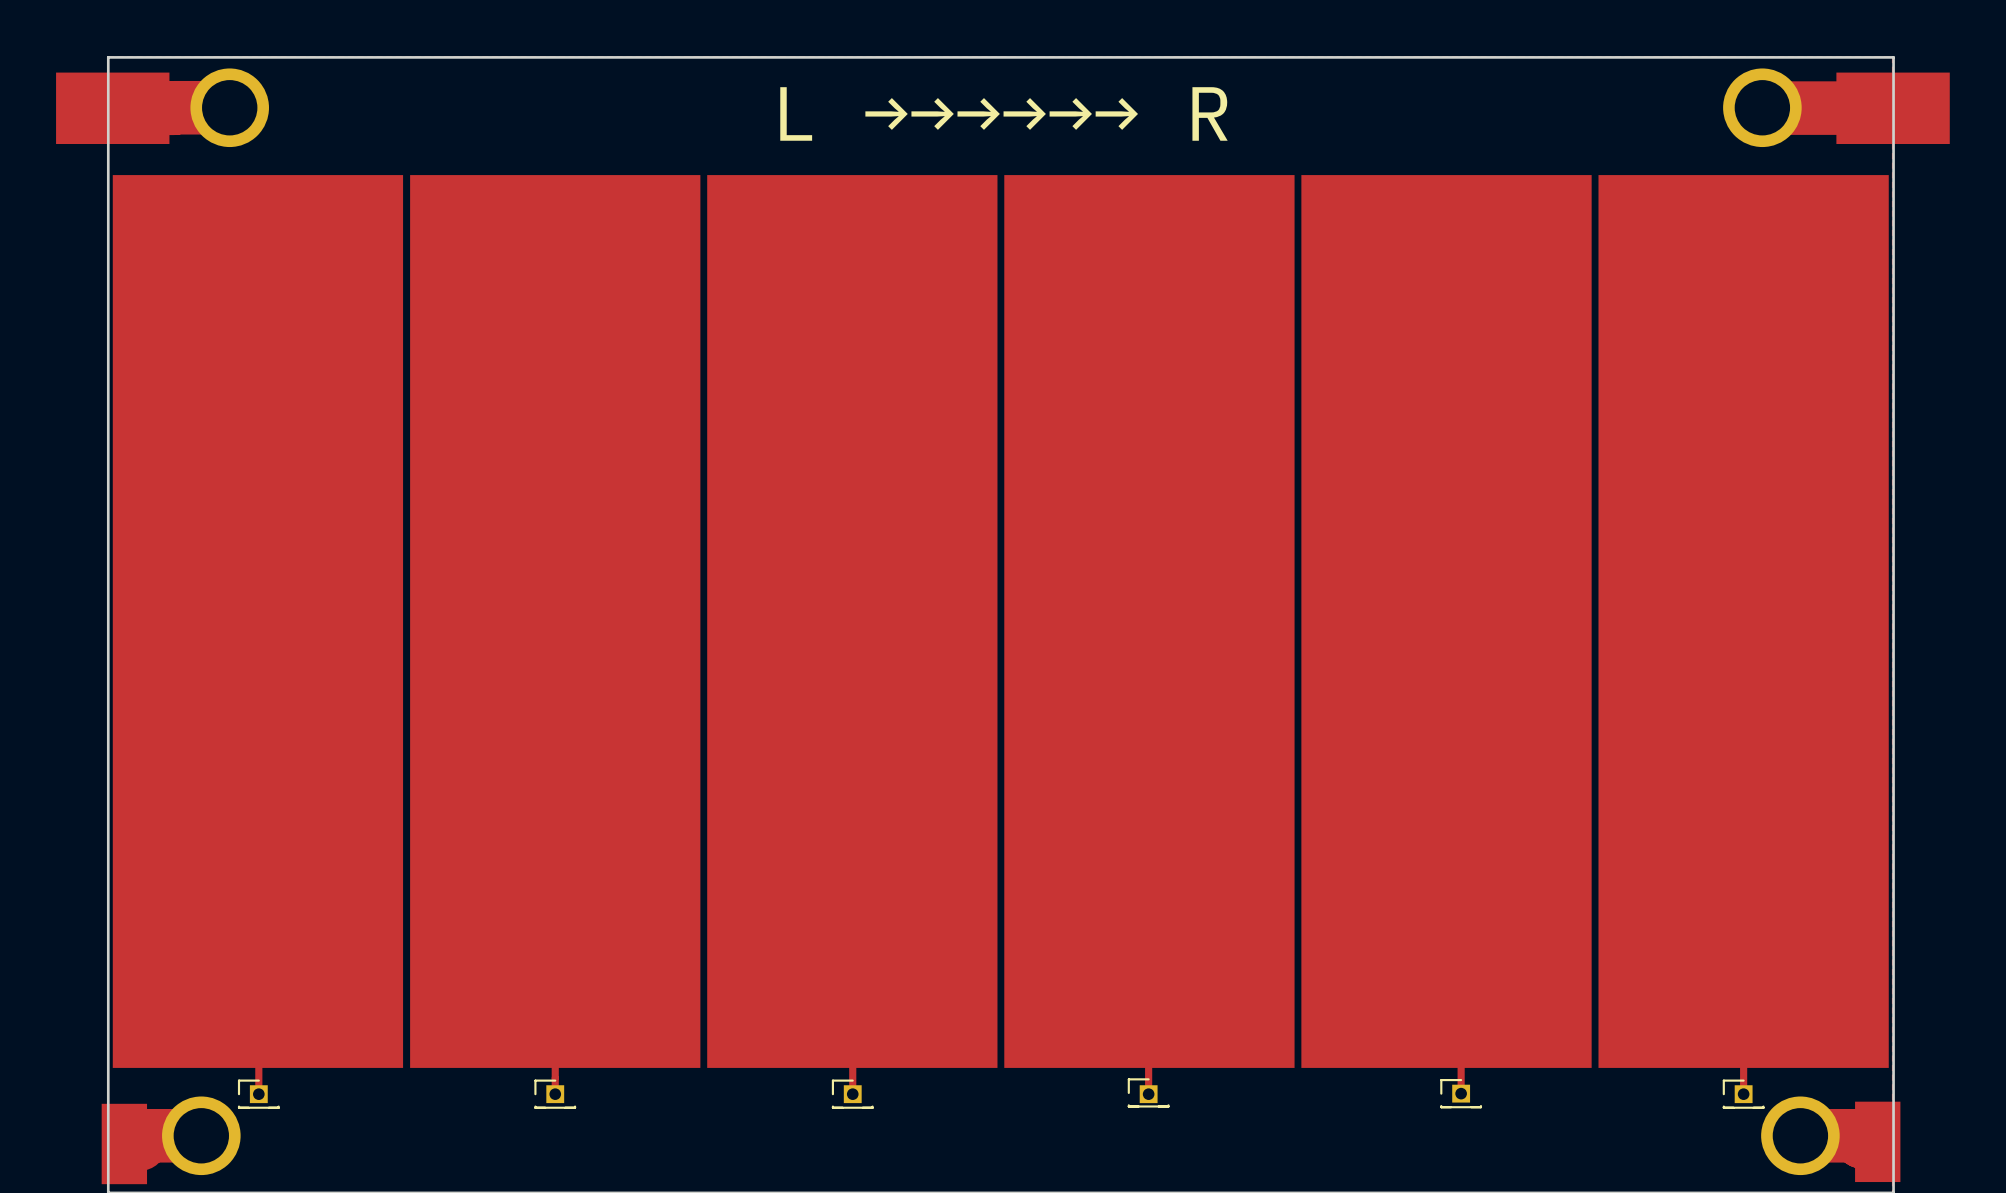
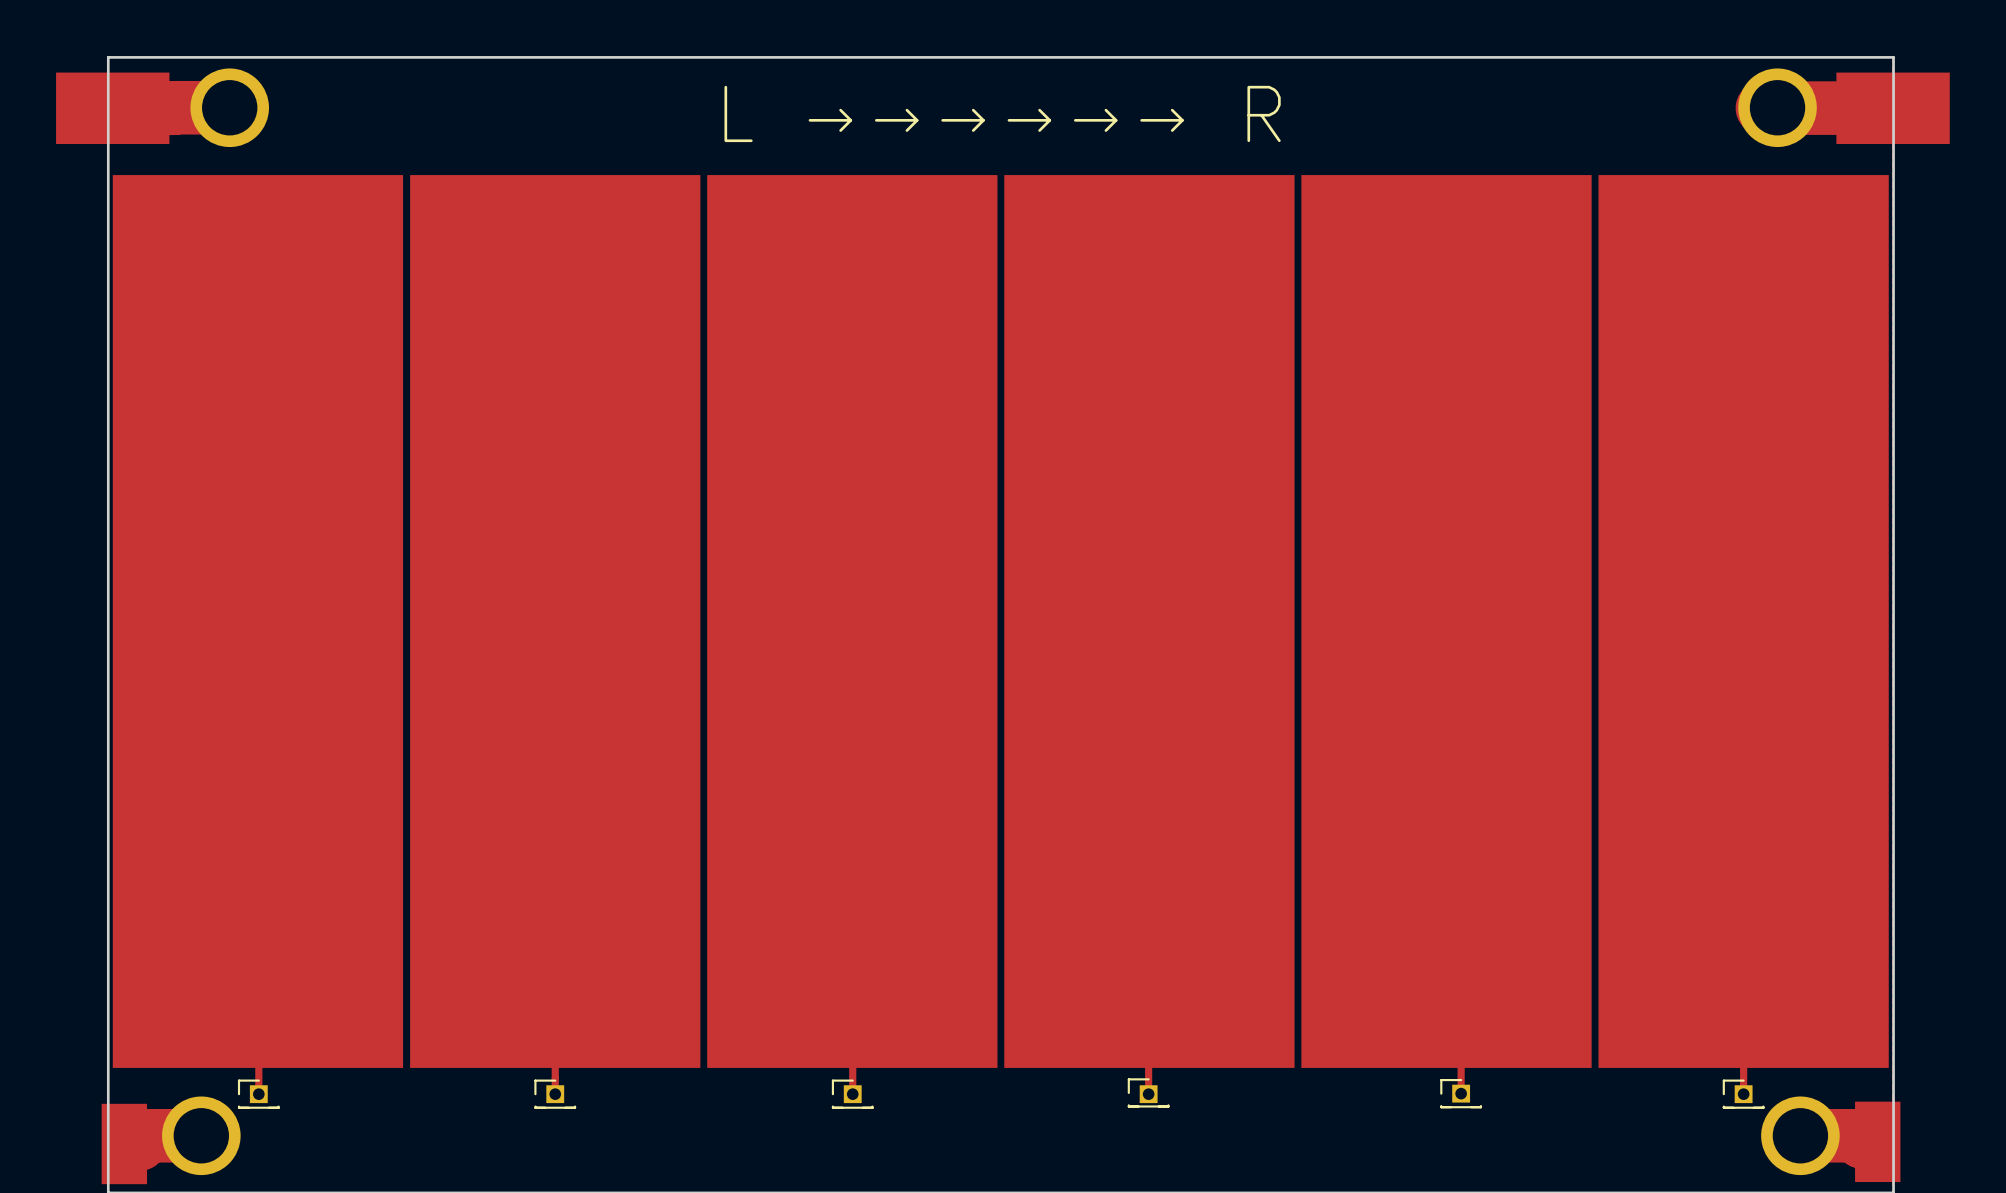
part position: (1762, 107) -> (1777, 107)

